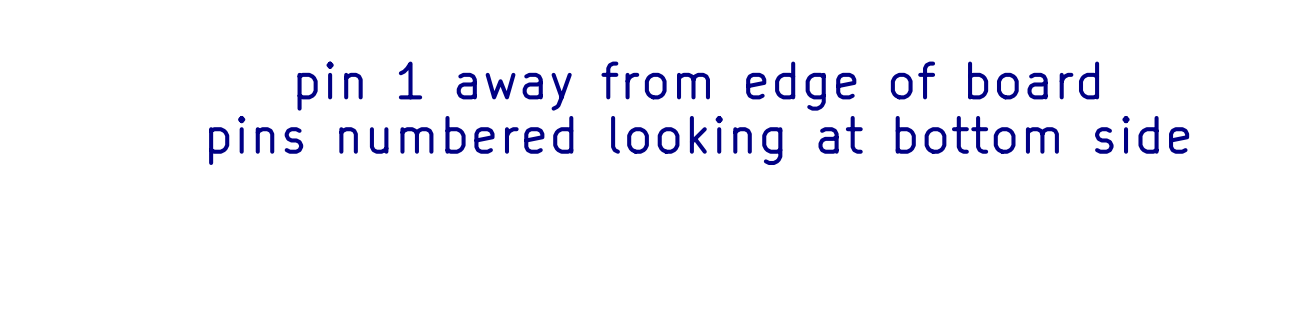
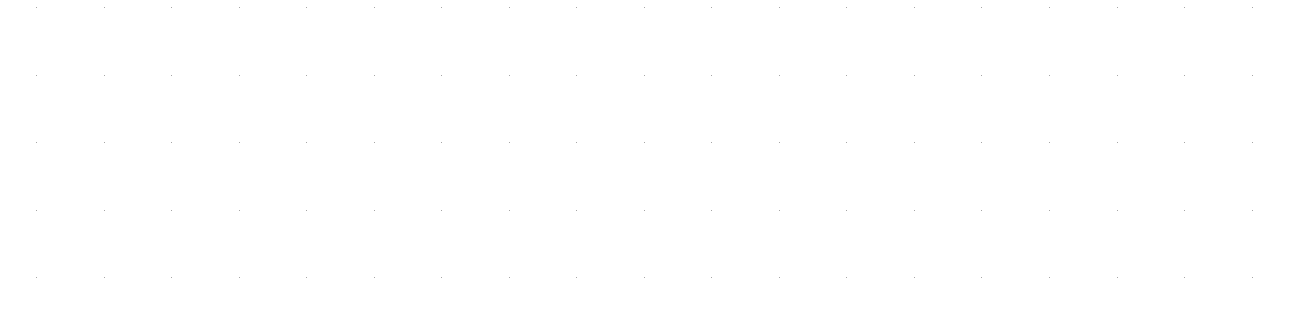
text: pin 1 away from edge of board (698, 86) -> none
text: pins numbered looking at bottom side (699, 140) -> none

